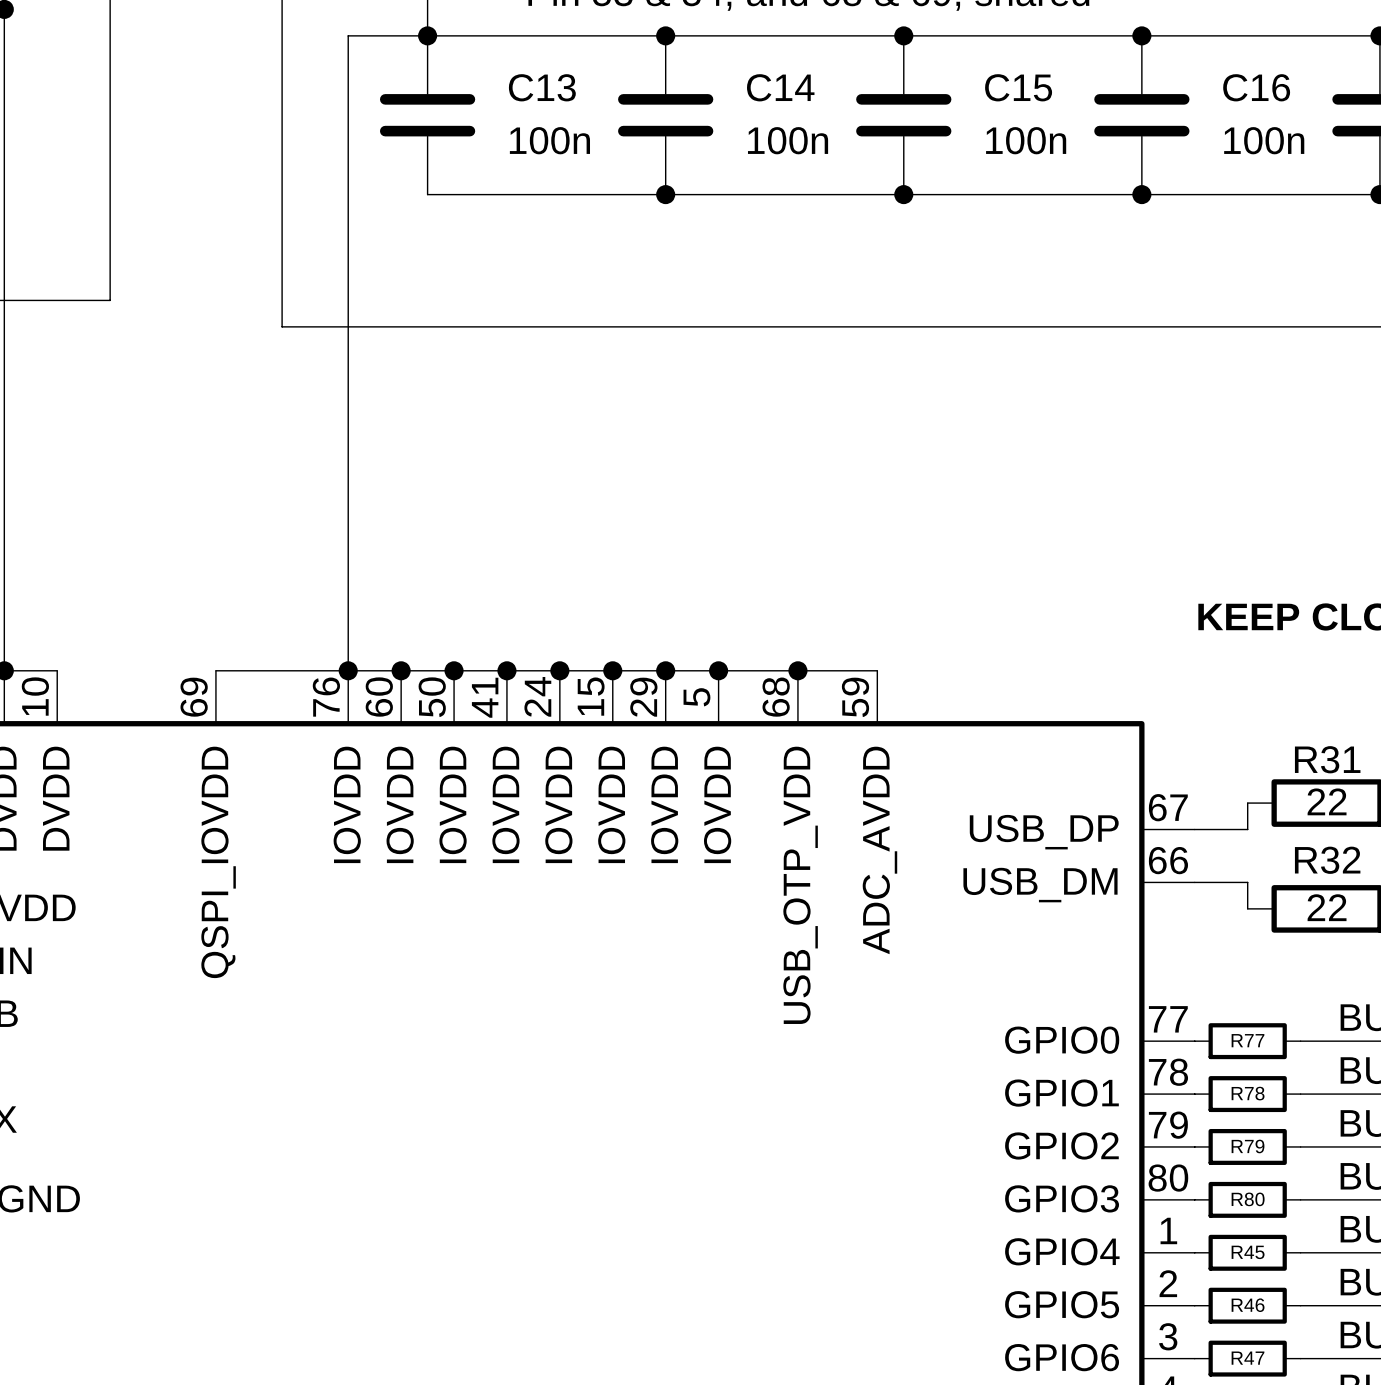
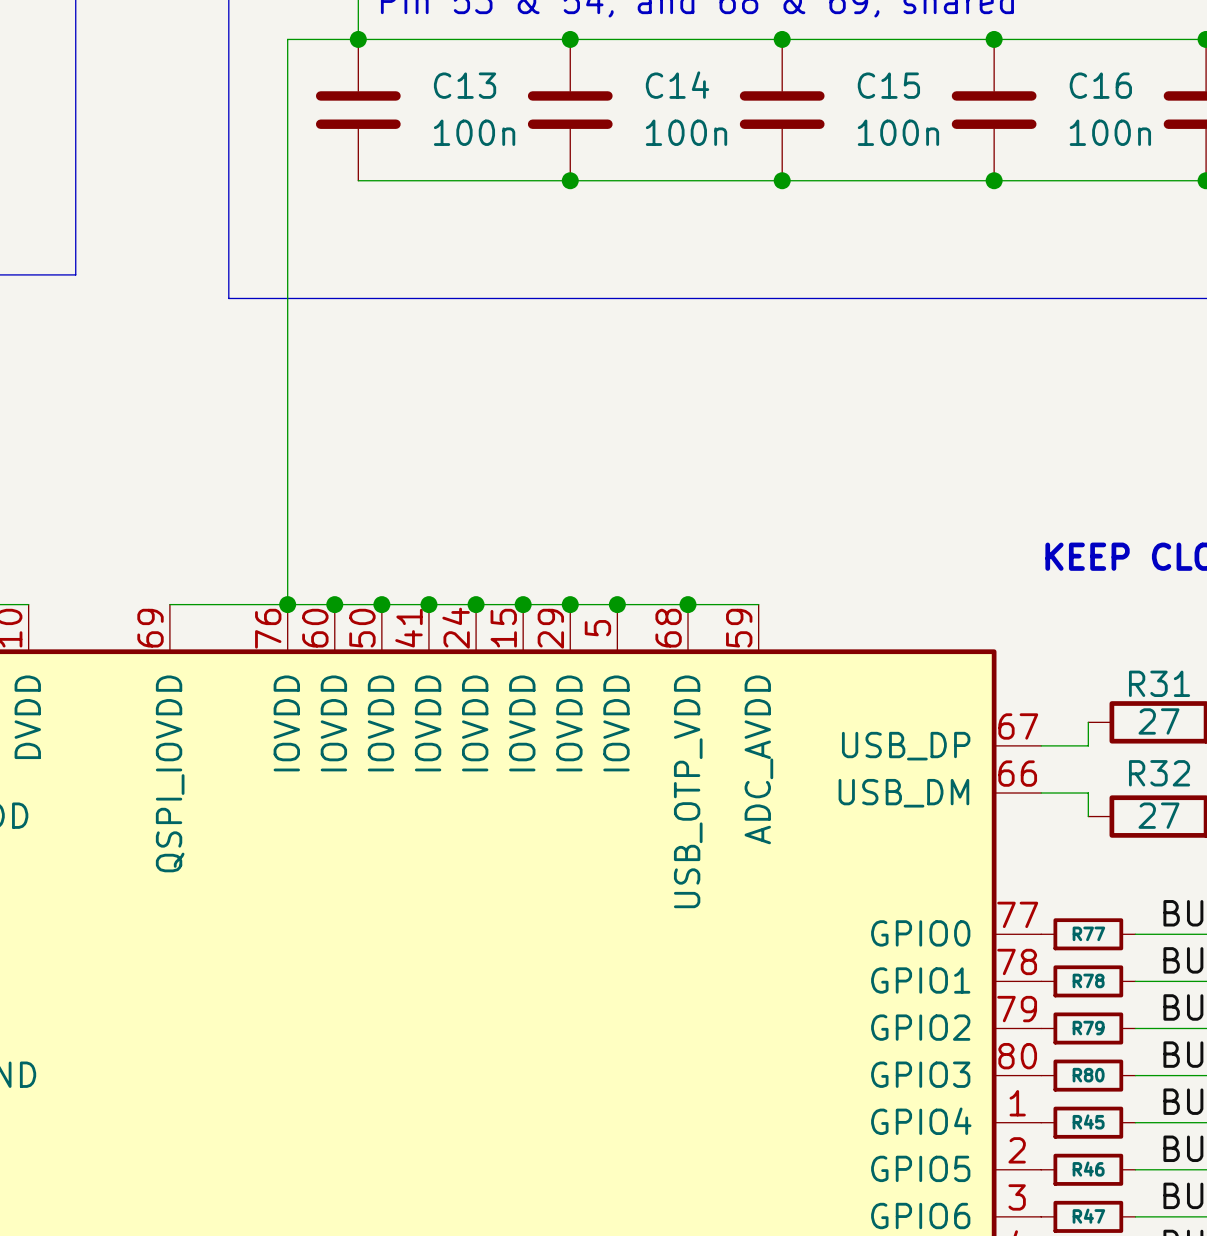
R31 value: 22 (1327, 801) -> 27 (1158, 721)
R32 value: 22 (1327, 907) -> 27 (1158, 815)

